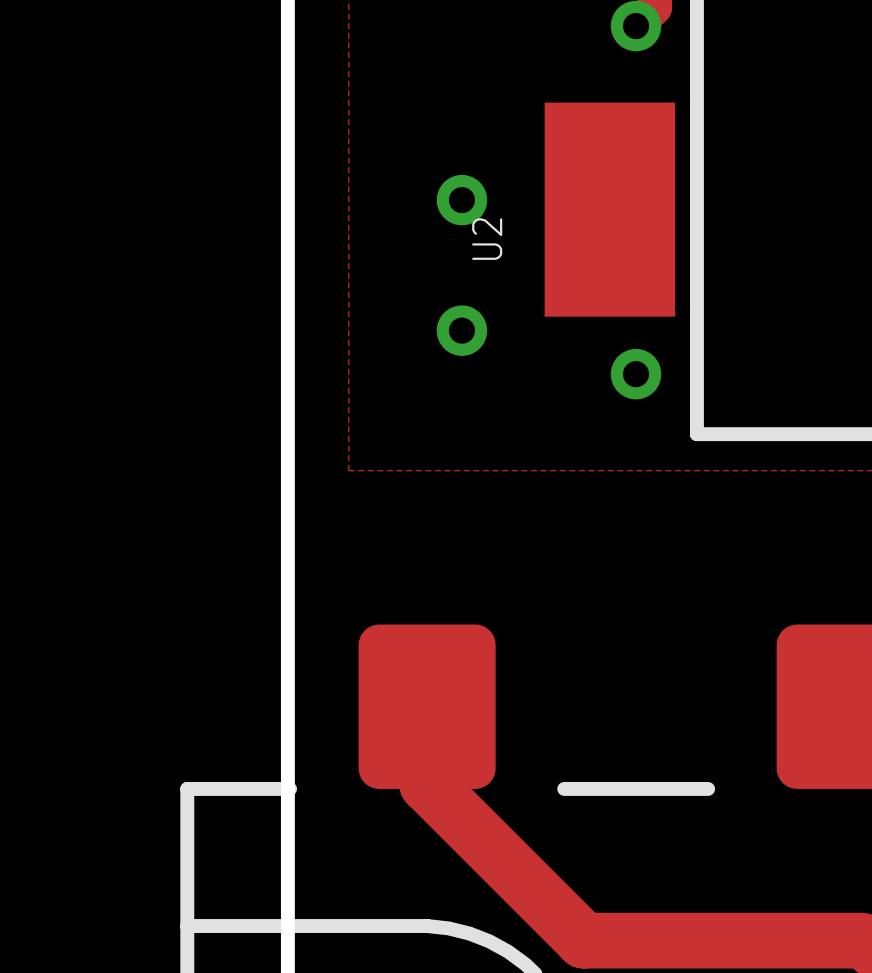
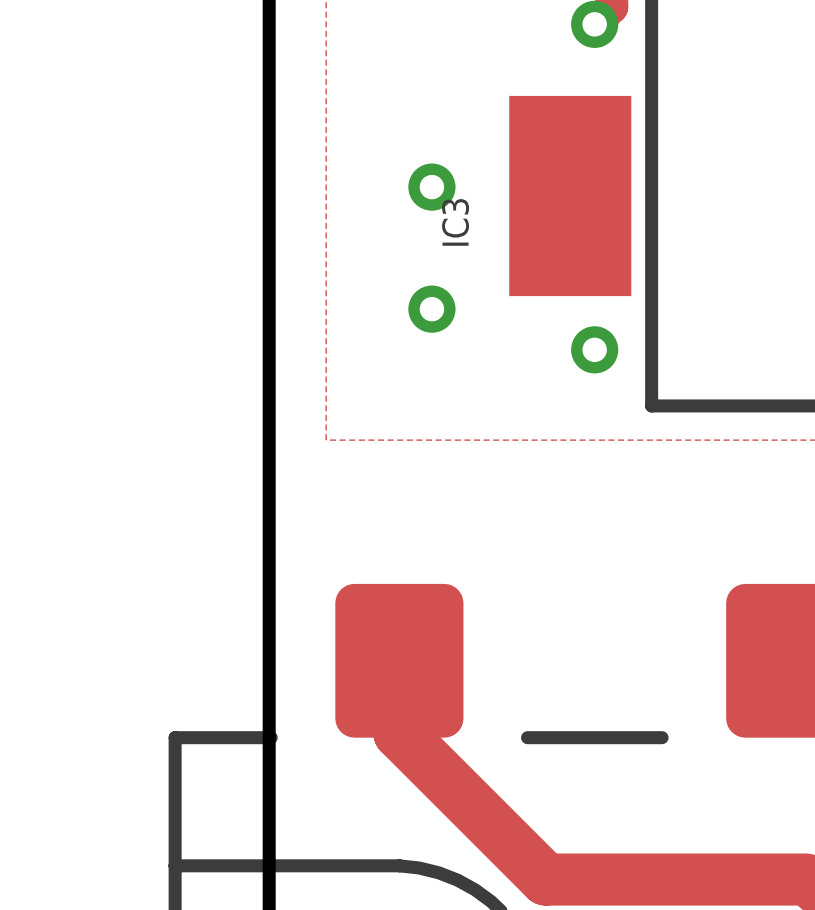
U2 name: U2 (487, 239) -> IC3 (455, 222)

